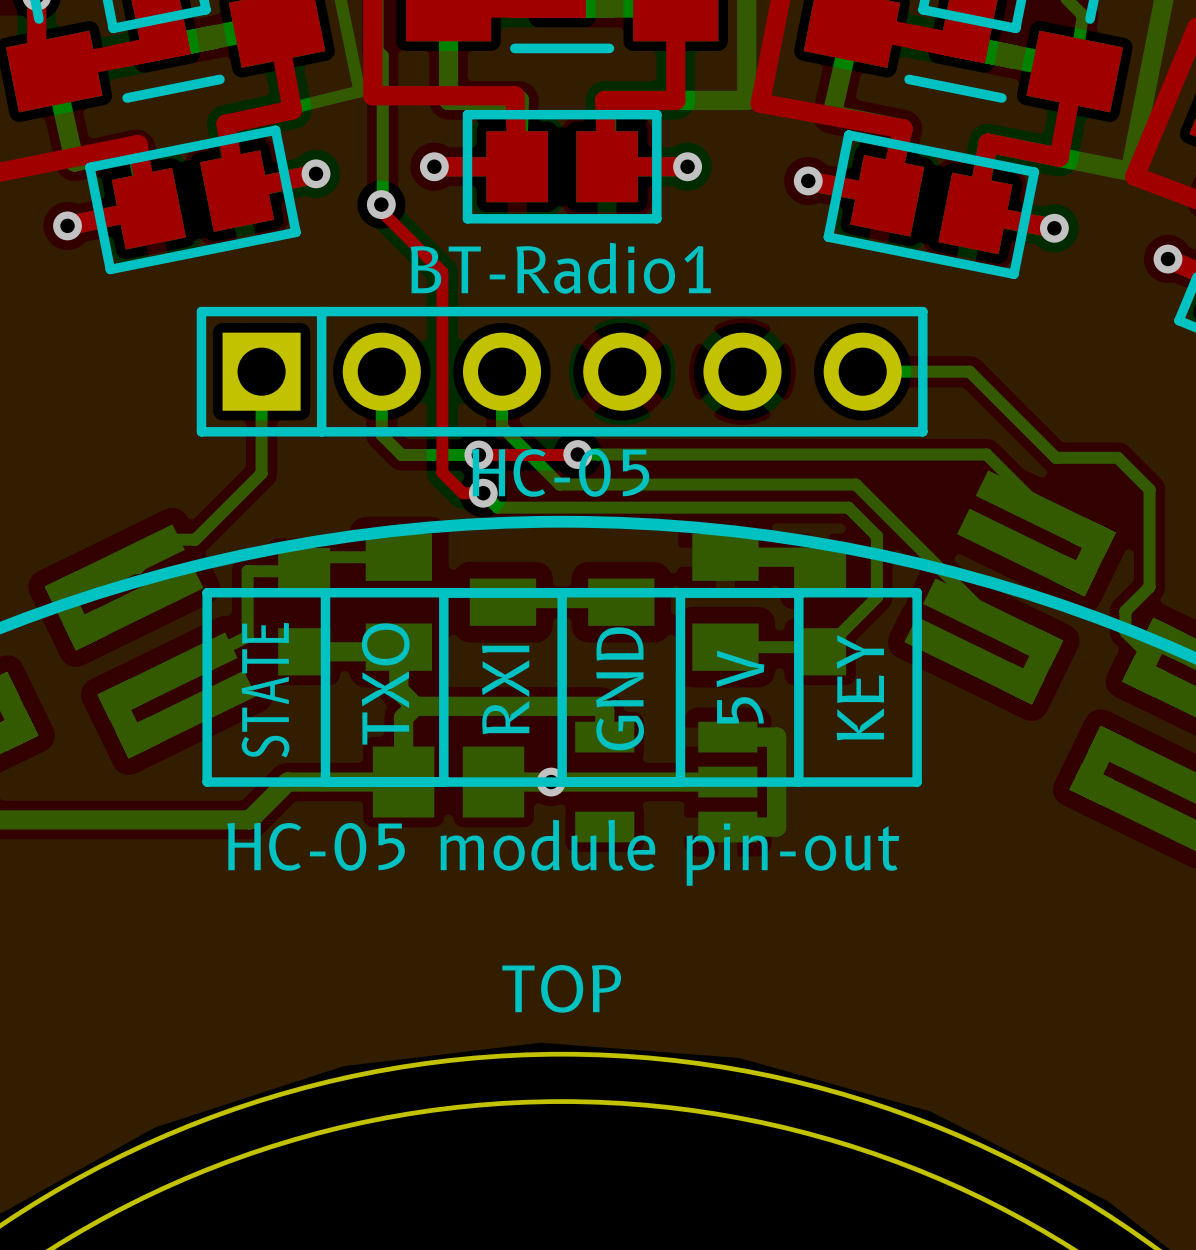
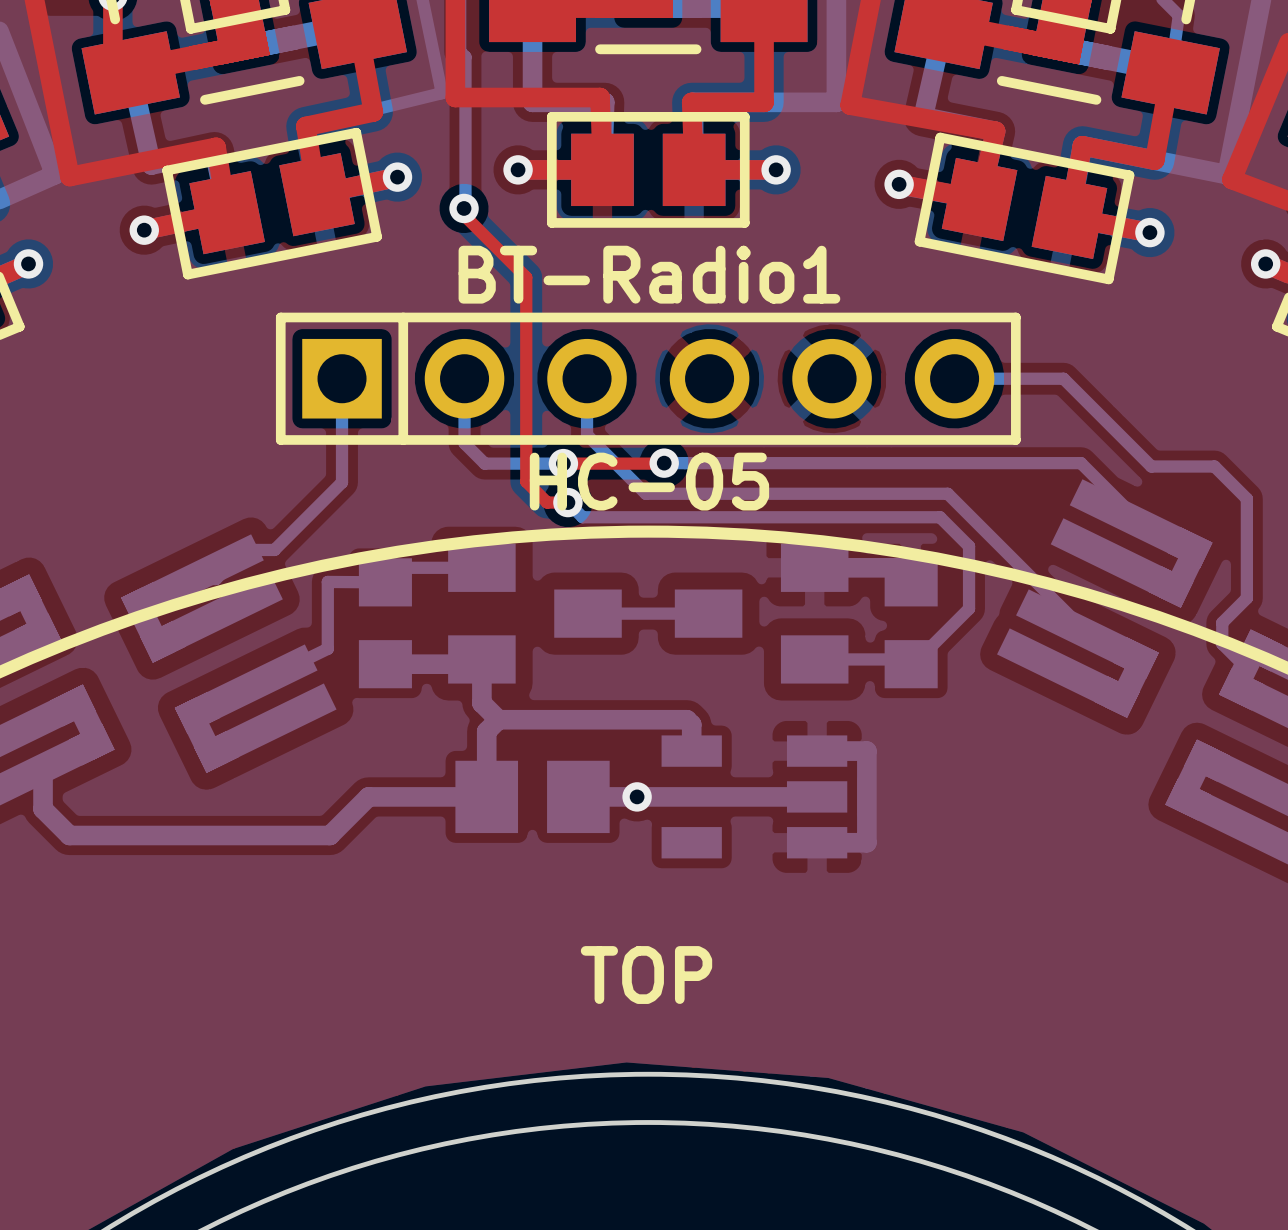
line: (207, 592) (917, 592) (917, 782) (207, 782) (207, 592) -> none
line: (325, 592) (325, 782) -> none
line: (443, 592) (443, 782) -> none
line: (562, 592) (562, 782) -> none
line: (680, 592) (680, 782) -> none
line: (798, 592) (798, 782) -> none
text: TXO (385, 683) -> none
text: 5V (740, 687) -> none
text: KEY (860, 687) -> none
text: GND (620, 688) -> none
text: RXI (505, 689) -> none
text: STATE (265, 690) -> none
text: HC-05 module pin-out (563, 852) -> none
text position: TOP (561, 988) -> TOP (646, 975)

